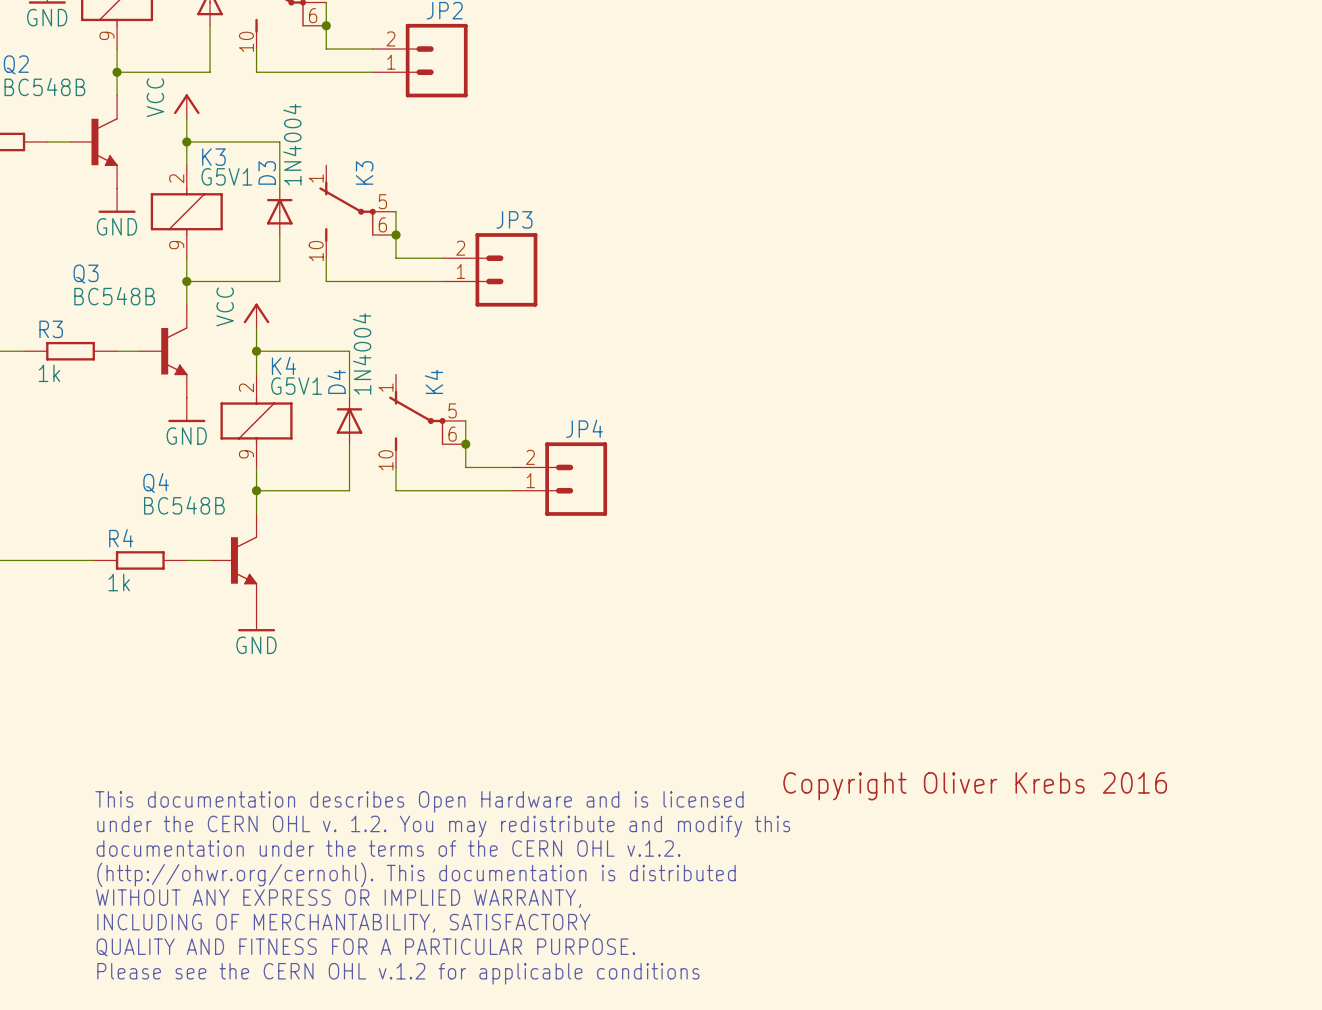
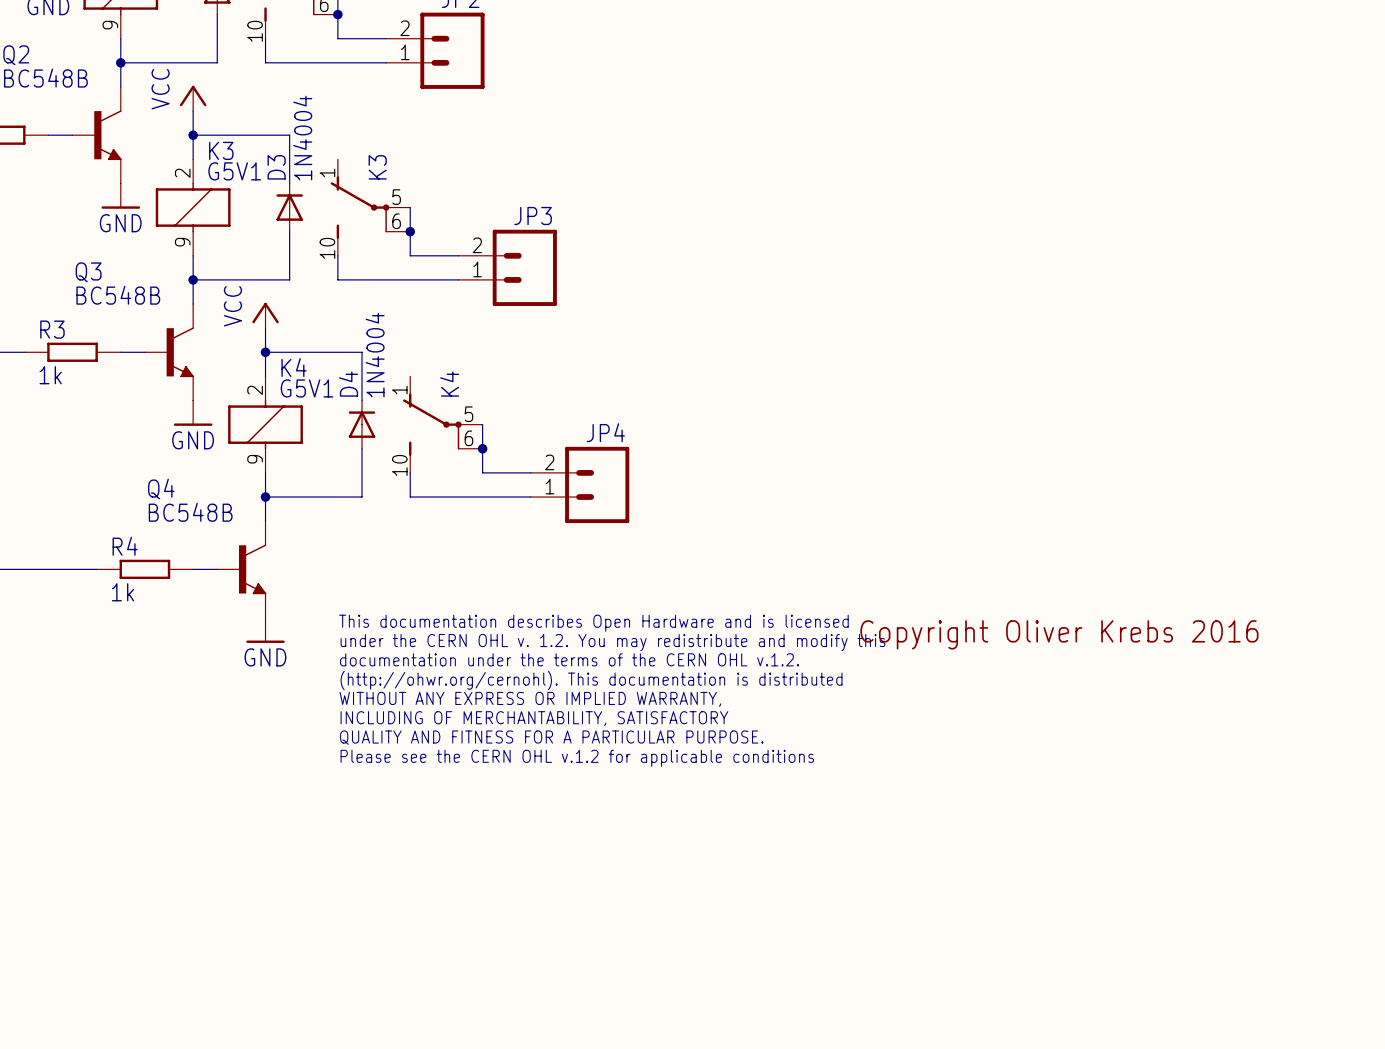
text: none -> This documentation describes Open Hardware and is licensed (593, 623)
text: none -> under the CERN OHL v. 1.2. You may redistribute and modify this (612, 642)
text: none -> documentation under the terms of the CERN OHL v.1.2. (569, 659)
text: none -> (http://ohwr.org/cernohl). This documentation is distributed (591, 680)
text: none -> WITHOUT ANY EXPRESS OR IMPLIED WARRANTY, (530, 699)
text: none -> INCLUDING OF MERCHANTABILITY, SATISFACTORY (534, 718)
text: none -> QUALITY AND FITNESS FOR A PARTICULAR PURPOSE. (551, 737)
text: none -> Please see the CERN OHL v.1.2 for applicable conditions (577, 758)
text position: Copyright Oliver Krebs 2016 (975, 786) -> Copyright Oliver Krebs 2016 (1059, 634)
text: This documentation describes Open Hardware and is licensed (419, 801) -> none
text: under the CERN OHL v. 1.2. You may redistribute and modify this (443, 826) -> none
text: documentation under the terms of the CERN OHL v.1.2. (388, 848) -> none
text: (http://ohwr.org/cernohl). This documentation is distributed (416, 874) -> none
text: WITHOUT ANY EXPRESS OR IMPLIED WARRANTY, (338, 898) -> none
text: INCLUDING OF MERCHANTABILITY, SATISFACTORY (343, 923) -> none
text: QUALITY AND FITNESS FOR A PARTICULAR PURPOSE. (365, 947) -> none
text: Please see the CERN OHL v.1.2 for applicable conditions (398, 973) -> none

